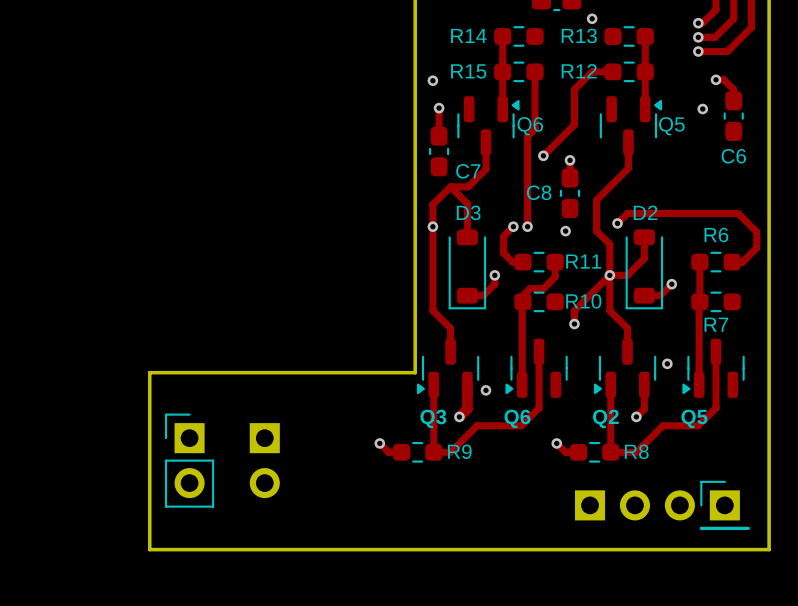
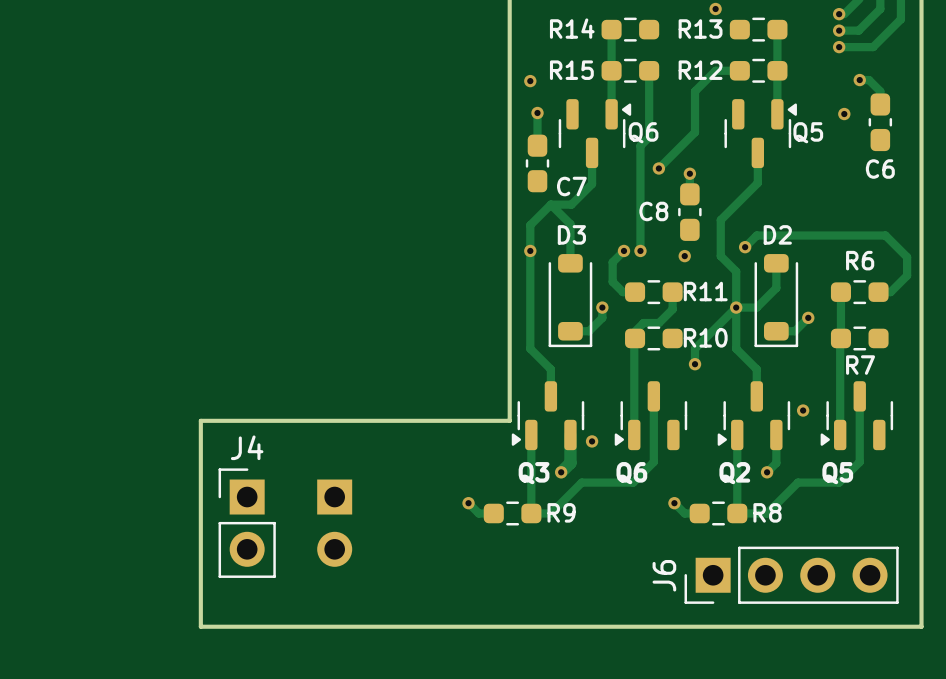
J4 name: none -> J4 (247, 447)
J6: none -> (791, 575)
part: (724, 505) -> none

